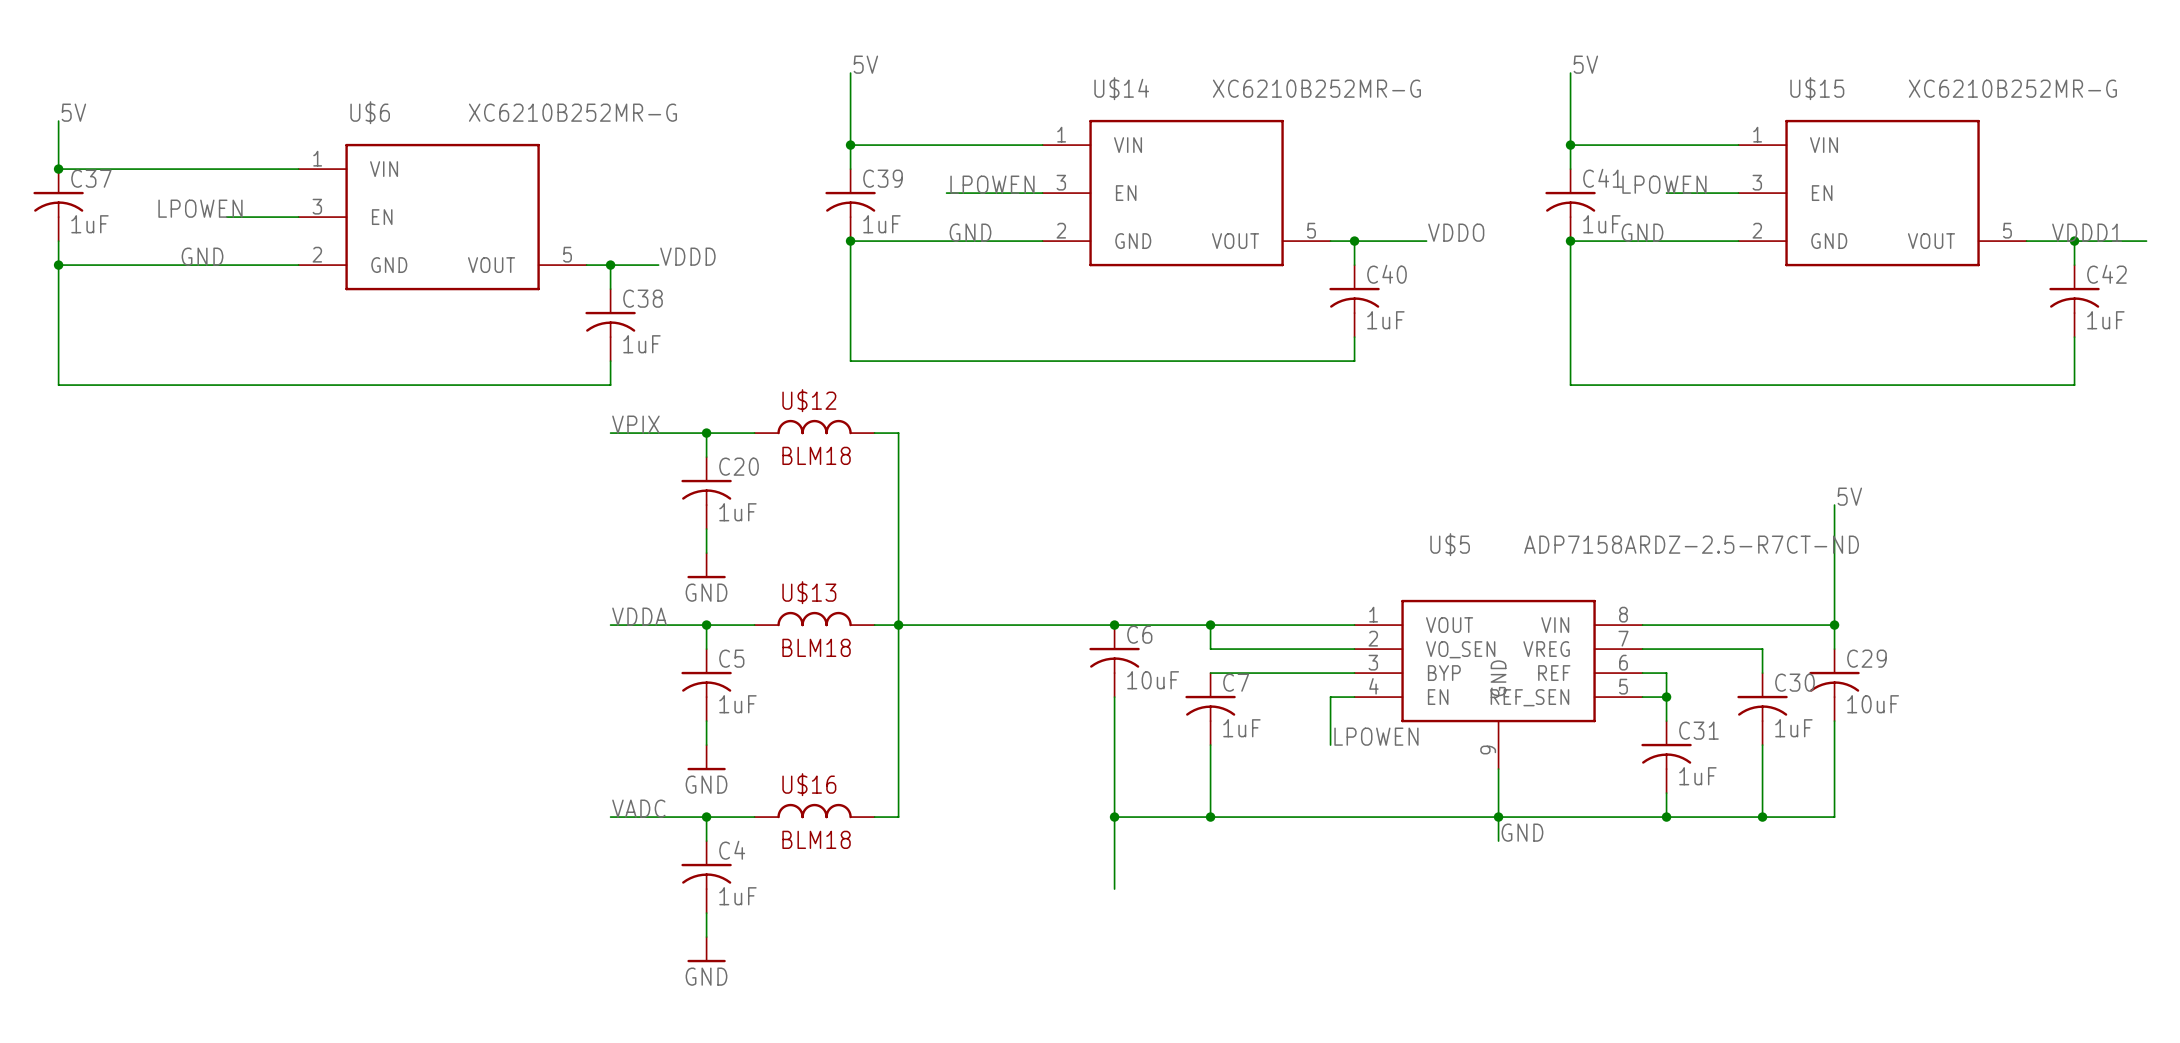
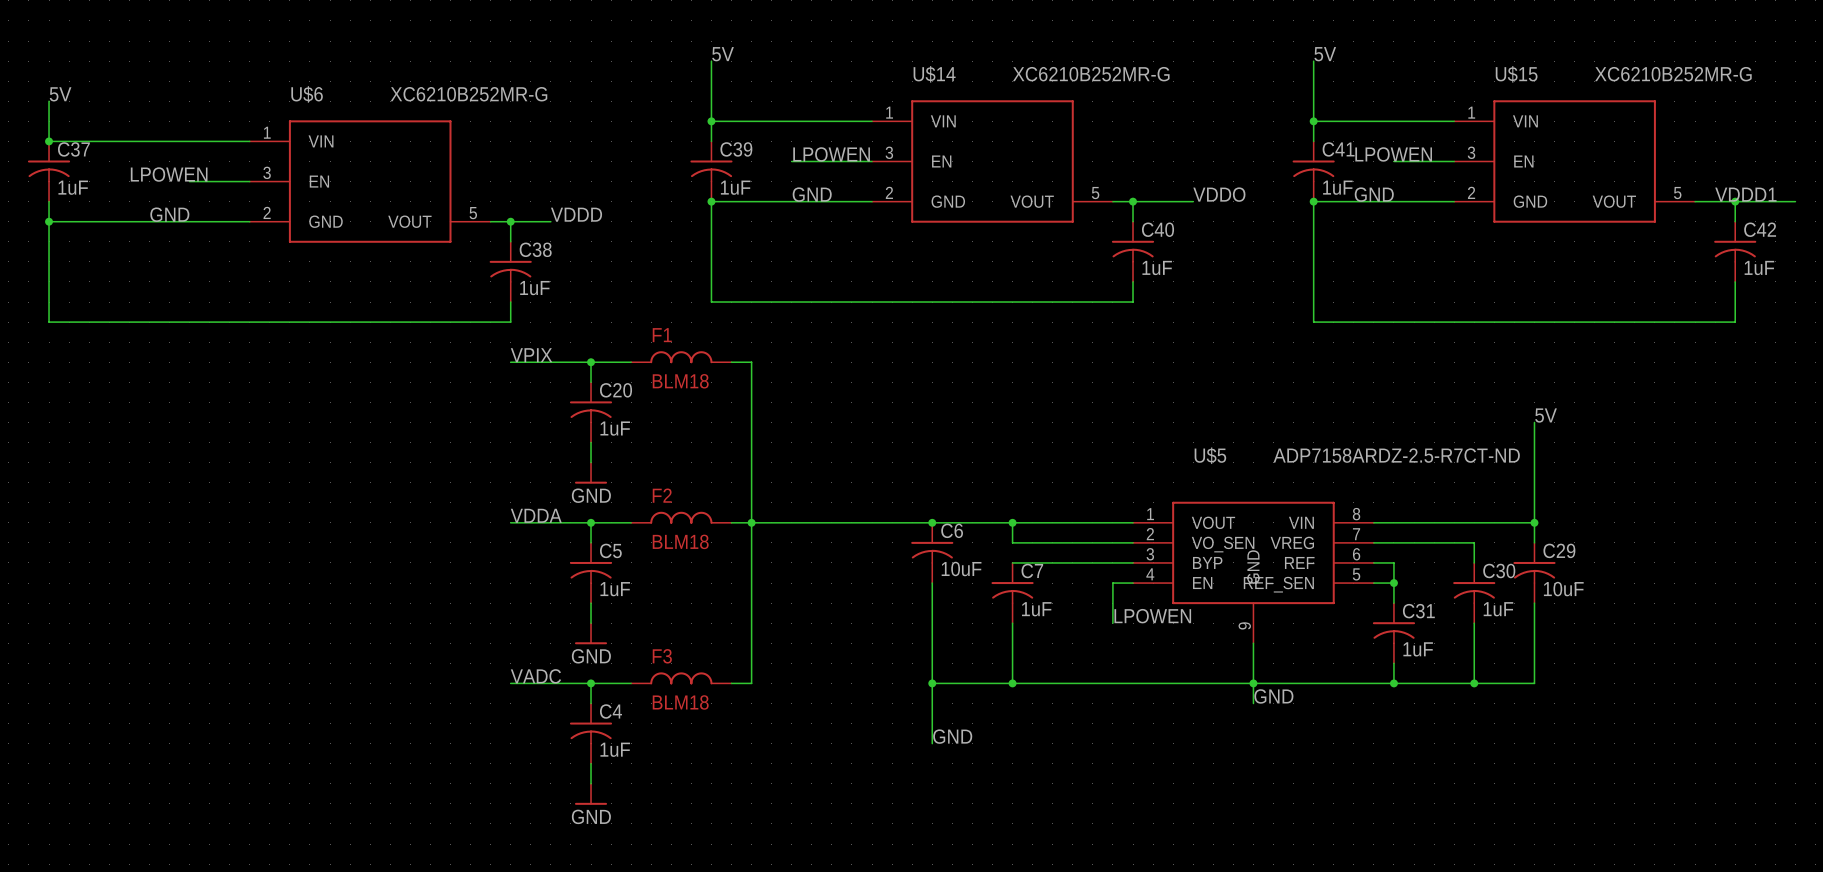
U$12 name: U$12 (809, 400) -> F1 (662, 335)
U$13 name: U$13 (809, 592) -> F2 (662, 495)
U$16 name: U$16 (809, 784) -> F3 (662, 656)
label: none -> GND (952, 736)

